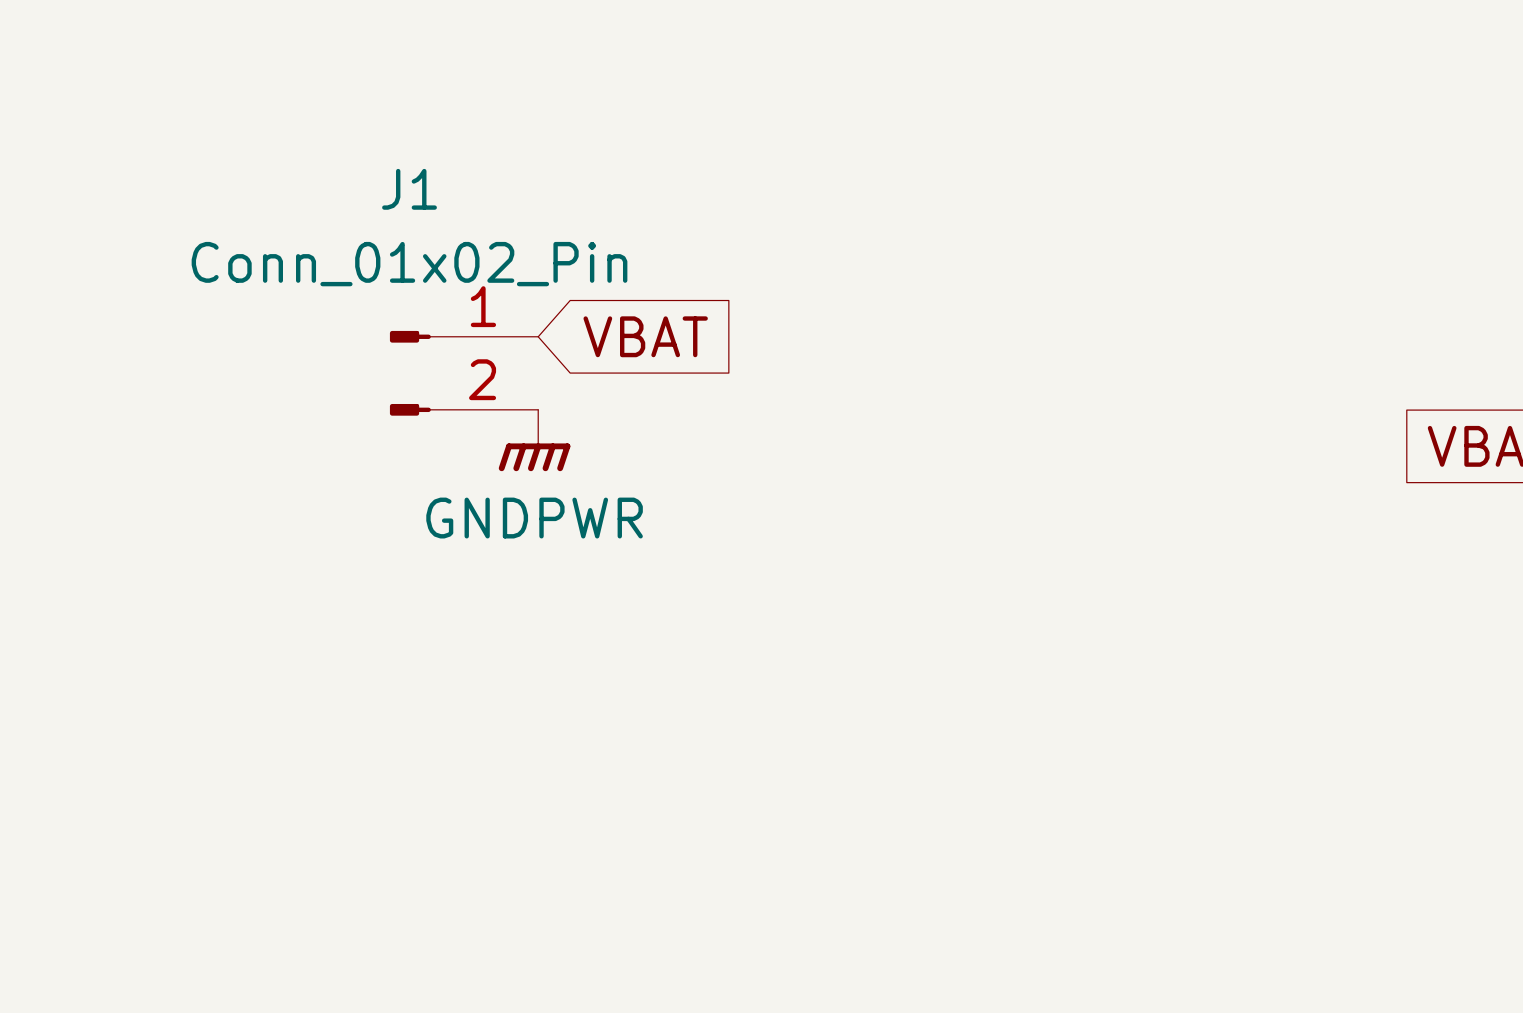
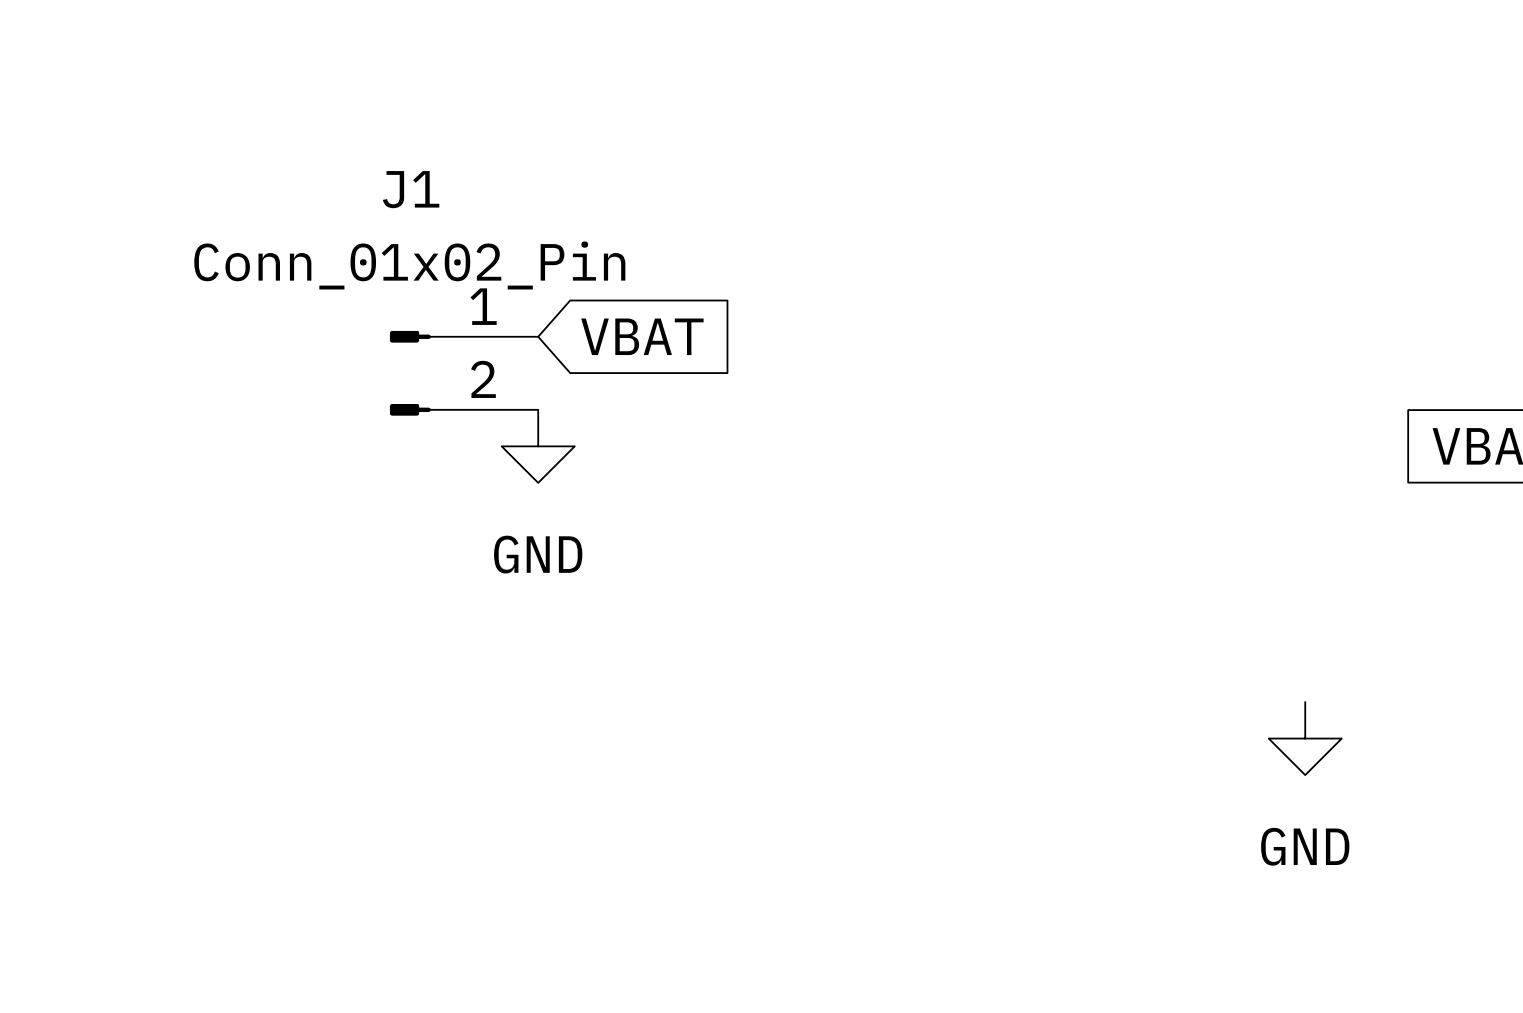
power symbol: GNDPWR (534, 440) -> GND (538, 446)
power symbol: none -> GND (1305, 738)

